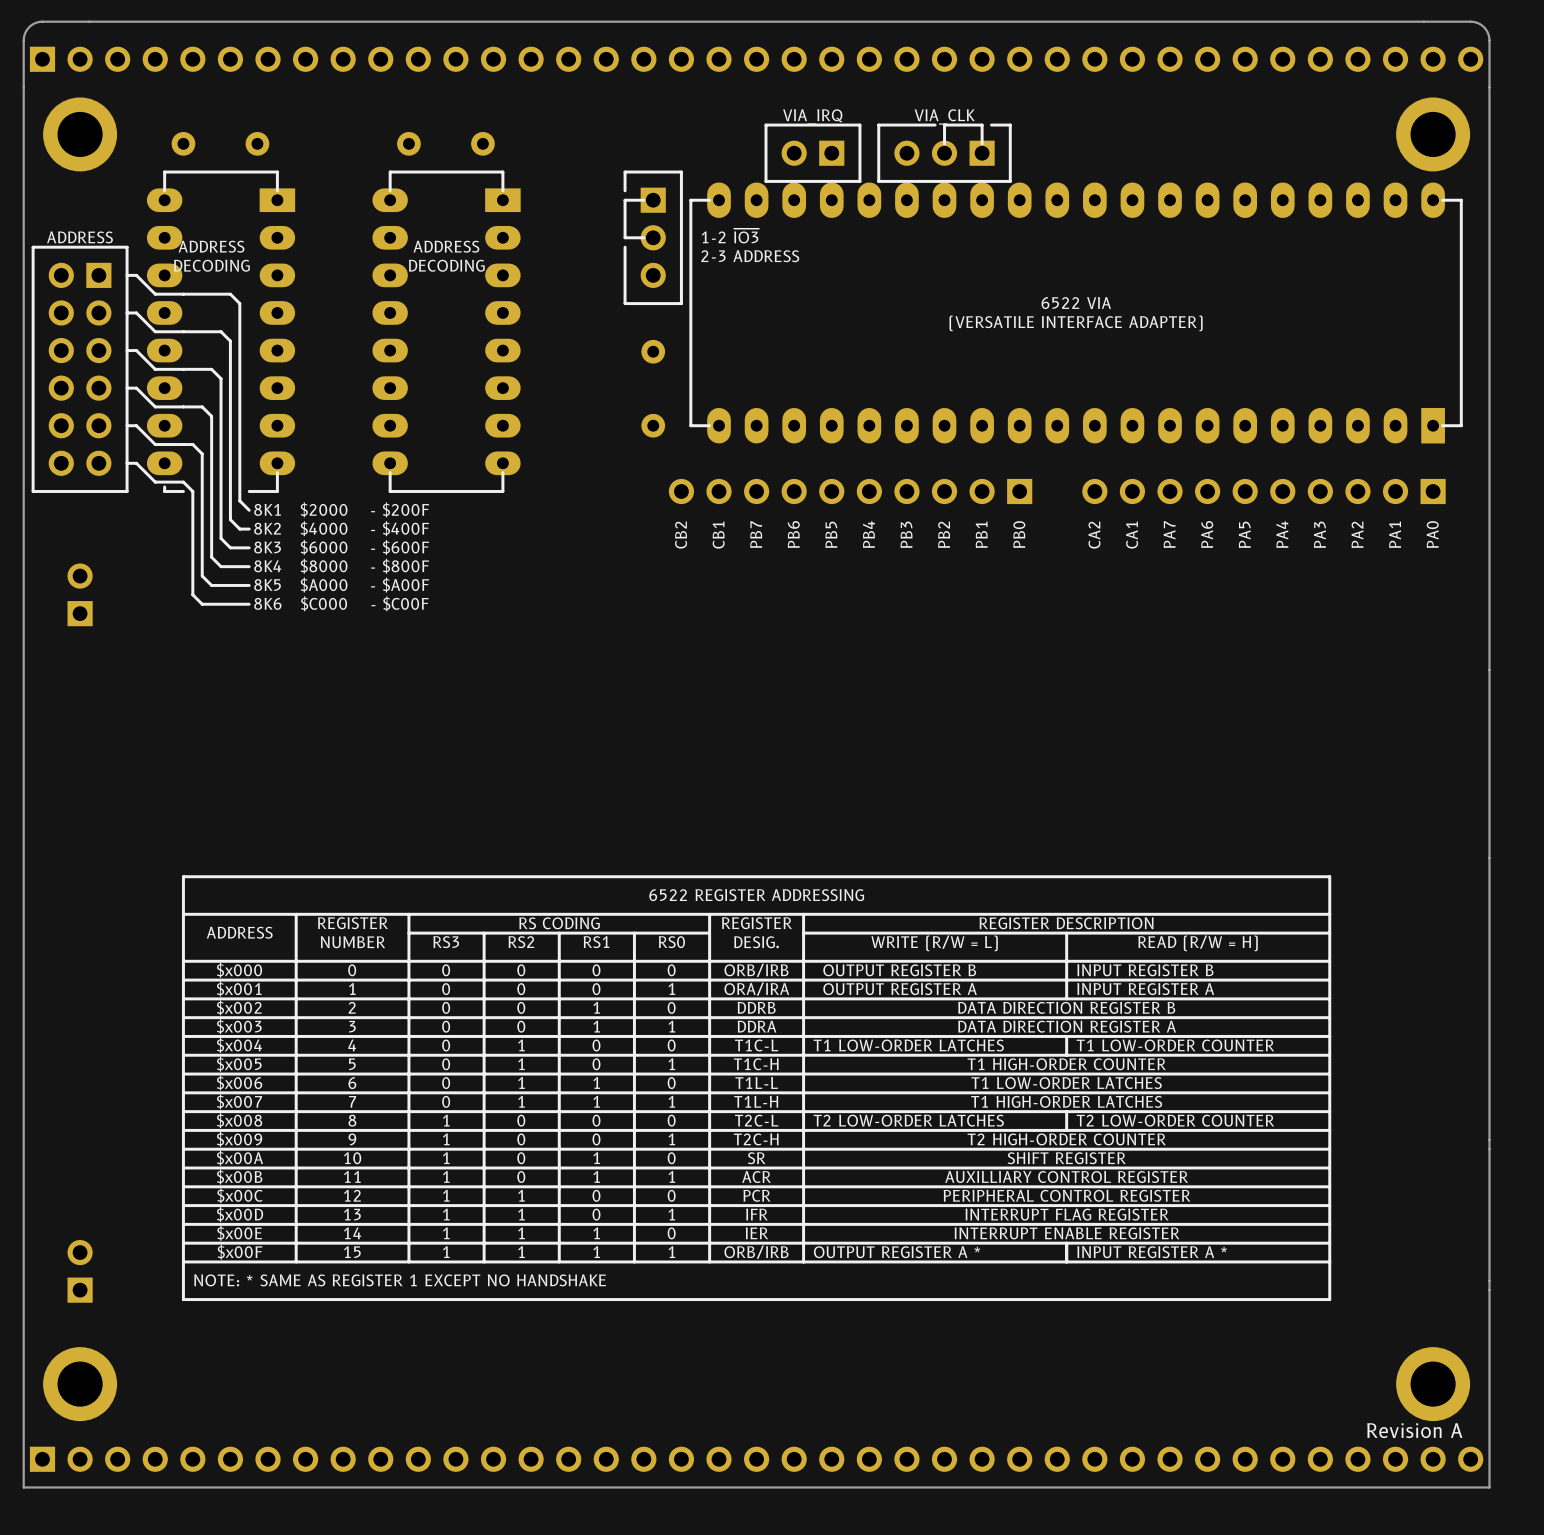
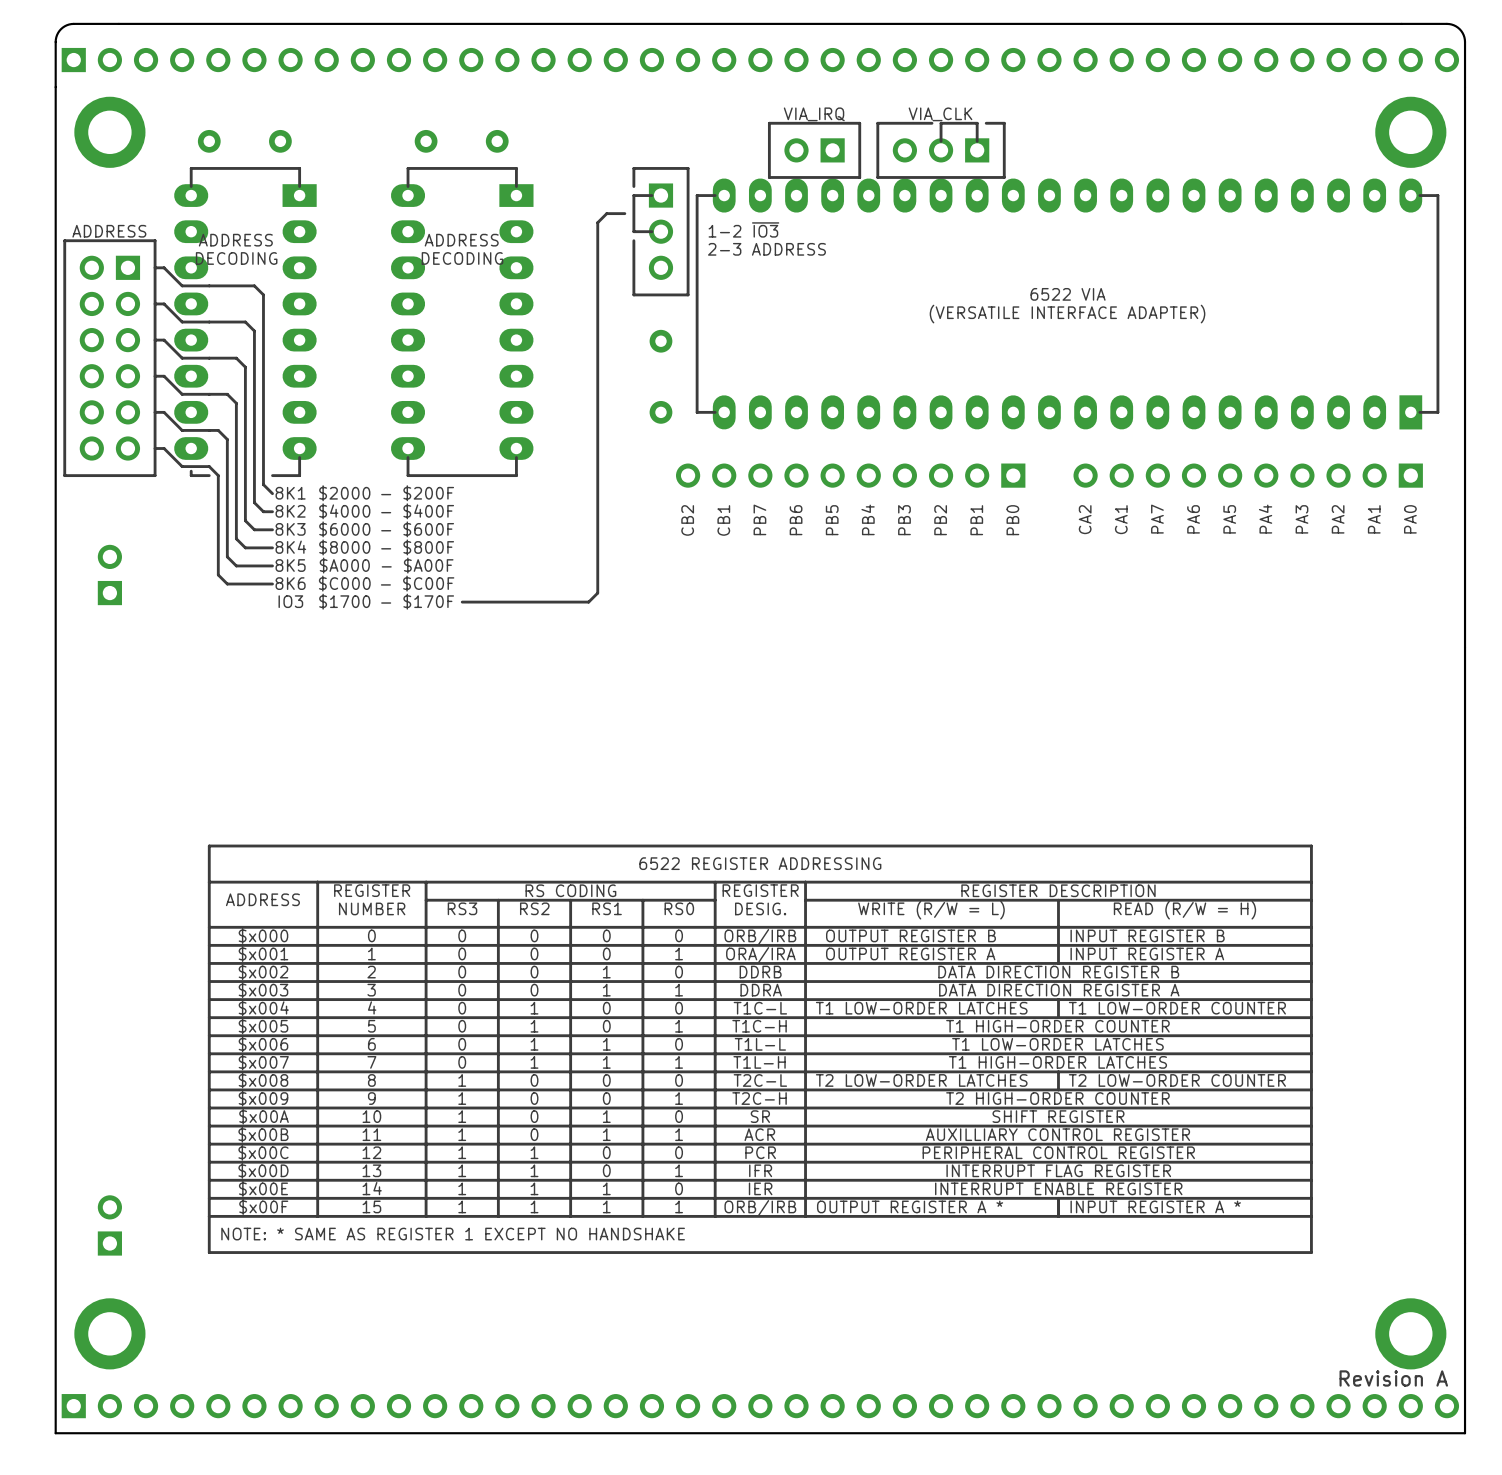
line: none -> (624, 213) (606, 213) (597, 222) (597, 593) (588, 602) (462, 602)
text: none -> IO3 (290, 601)
text: none -> $1700 (344, 601)
text: none -> - $170F (417, 601)

